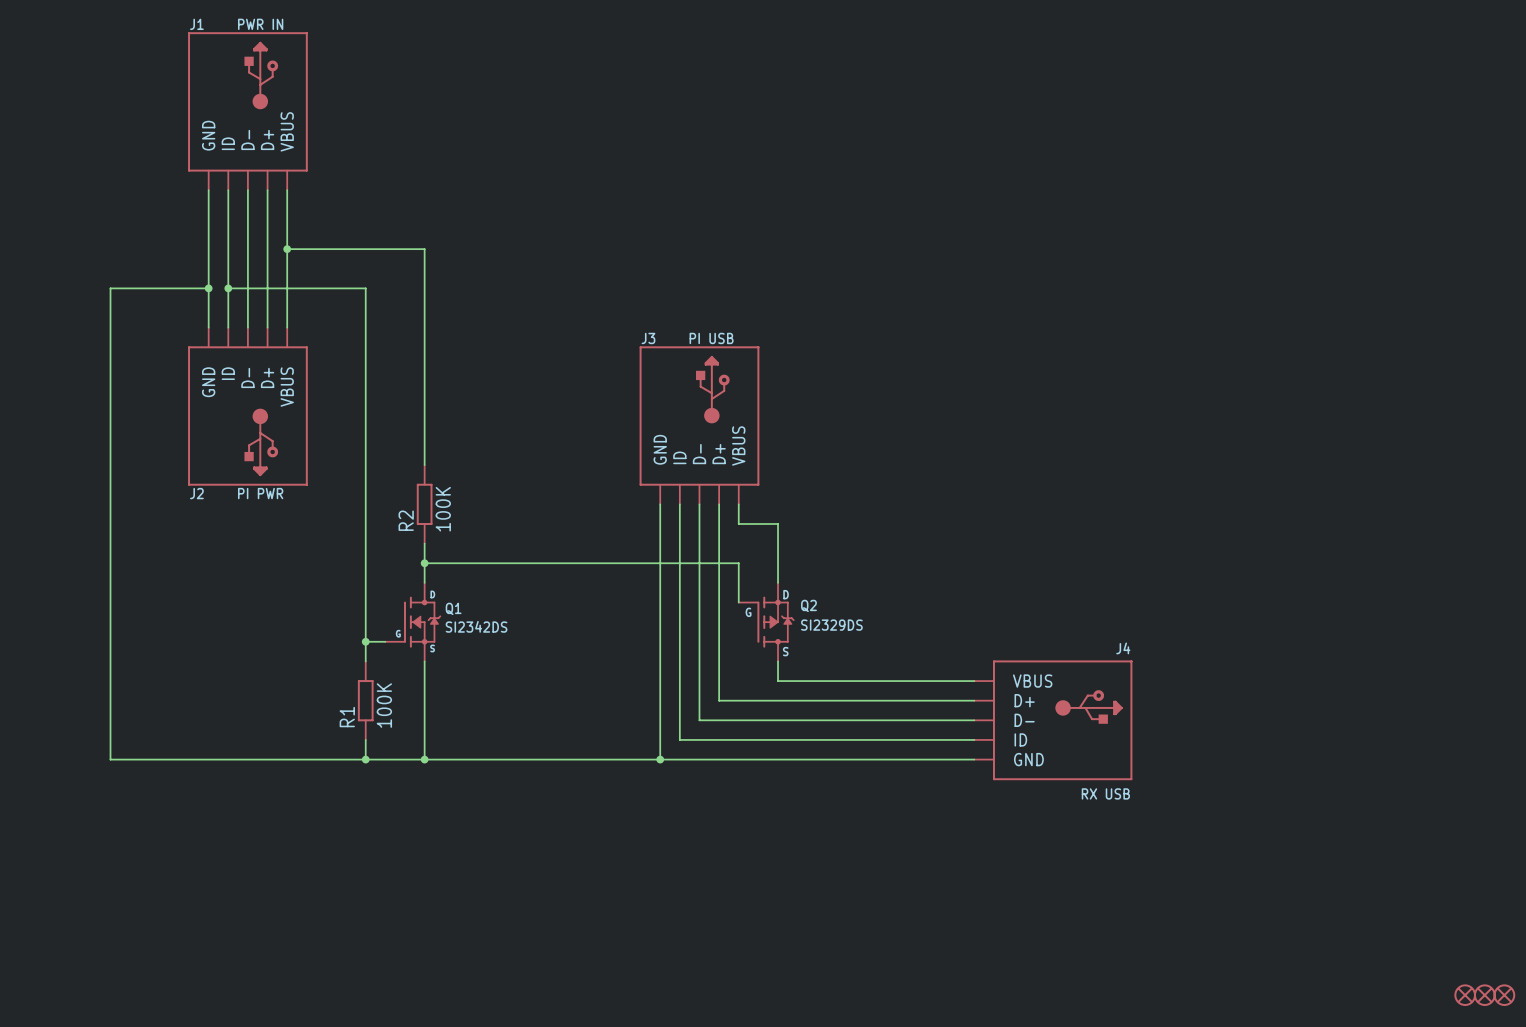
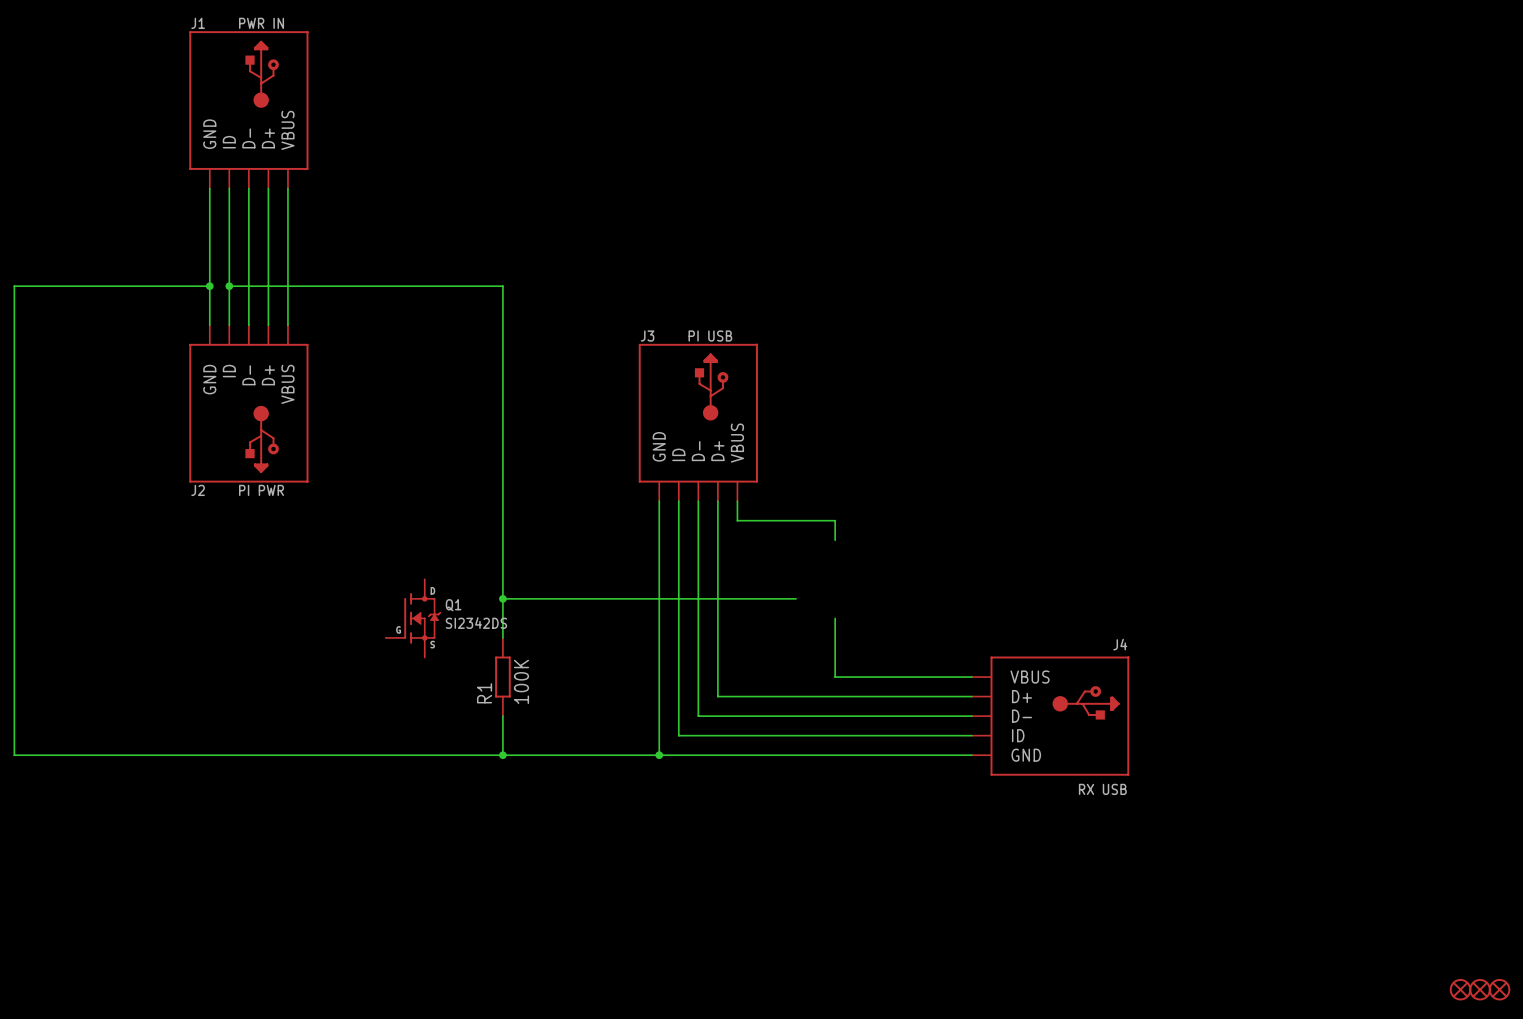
wire: (287, 249) (424, 249) (424, 465) -> none
junction: (287, 249) -> none
wire: (110, 288) (110, 759) -> (112, 286) (14, 286) (14, 755) (112, 755)
wire: (365, 288) (365, 661) -> (366, 286) (502, 286) (502, 637)
R2: 100K (424, 504) -> none
wire: (778, 523) (778, 582) -> (776, 520) (835, 520) (835, 540)
wire: (424, 543) (424, 582) -> none
wire: (424, 563) (738, 563) (738, 602) -> none
junction: (424, 563) -> none
wire: none -> (502, 598) (796, 598)
junction: none -> (502, 598)
Q2: SI2329DS (766, 622) -> none
wire: (365, 641) (385, 641) -> none
junction: (365, 641) -> none
wire: (424, 661) (424, 759) -> none
wire: (778, 661) (778, 681) (836, 681) -> (835, 618) (835, 677)
R1 position: (365, 700) -> (502, 677)
wire: none -> (502, 716) (502, 755)
wire: (365, 739) (365, 759) -> none
junction: (365, 759) -> none
junction: (424, 759) -> none
junction: none -> (502, 755)

